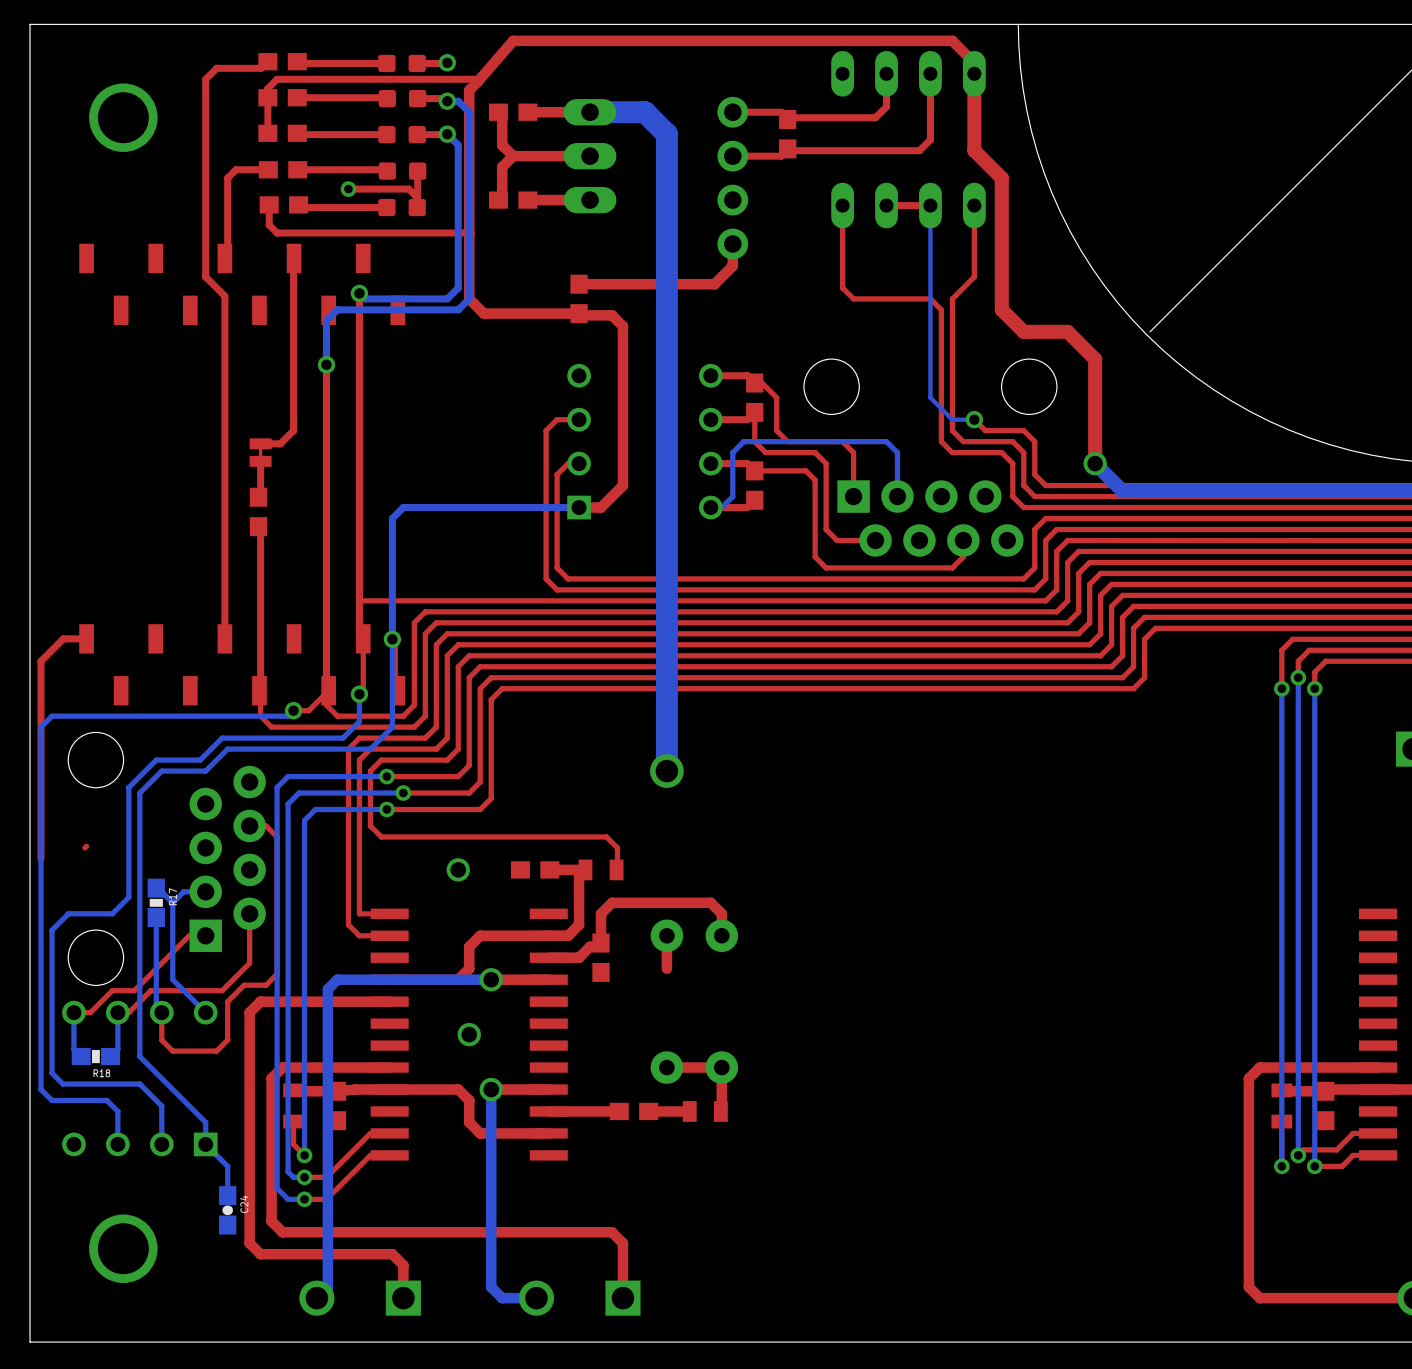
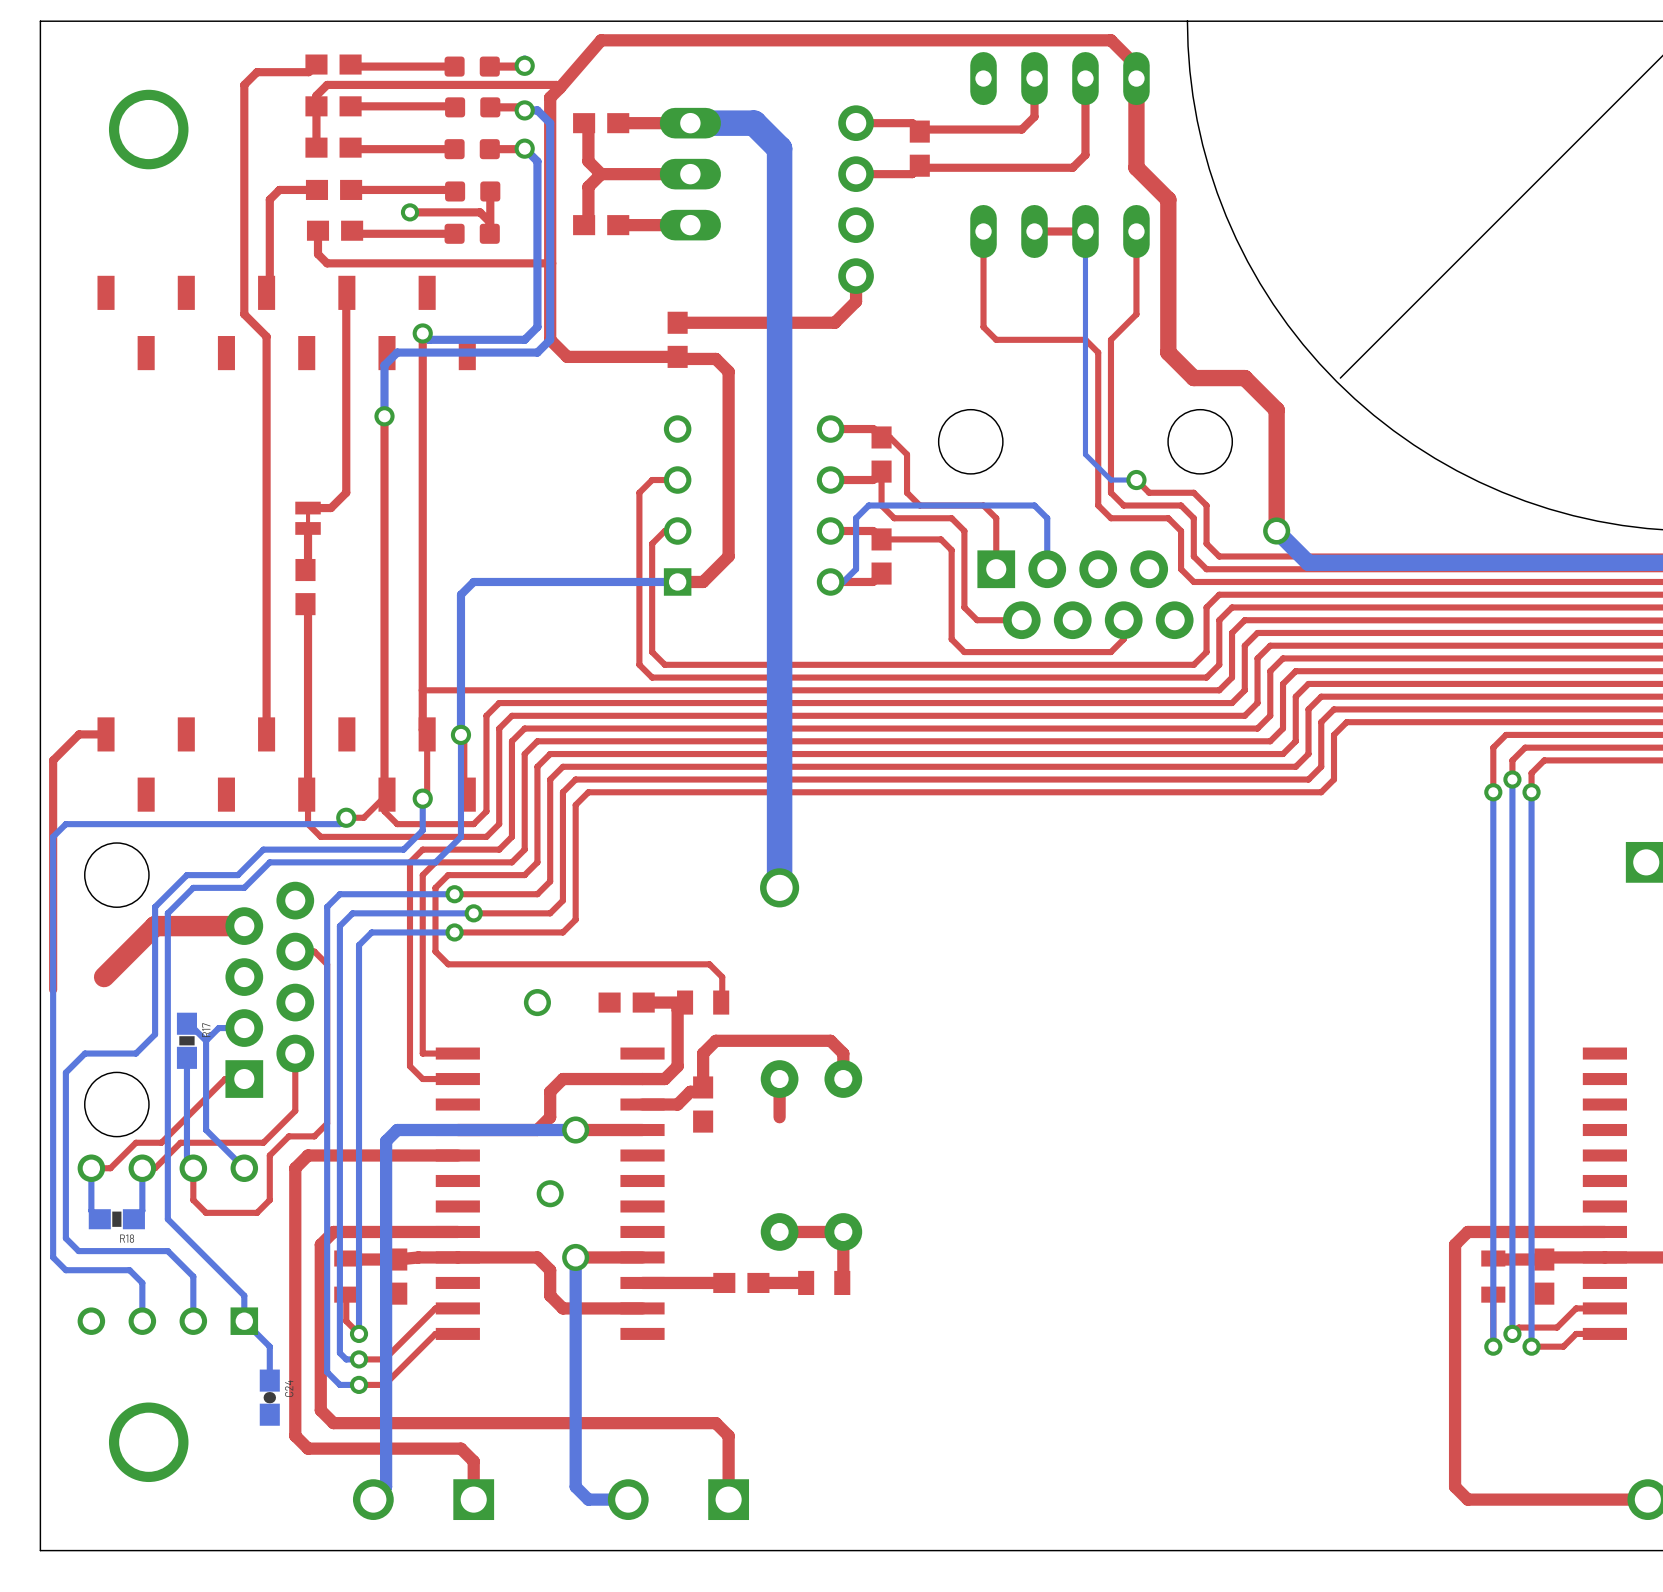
top track: none -> (244, 926) (155, 926) (104, 977)

